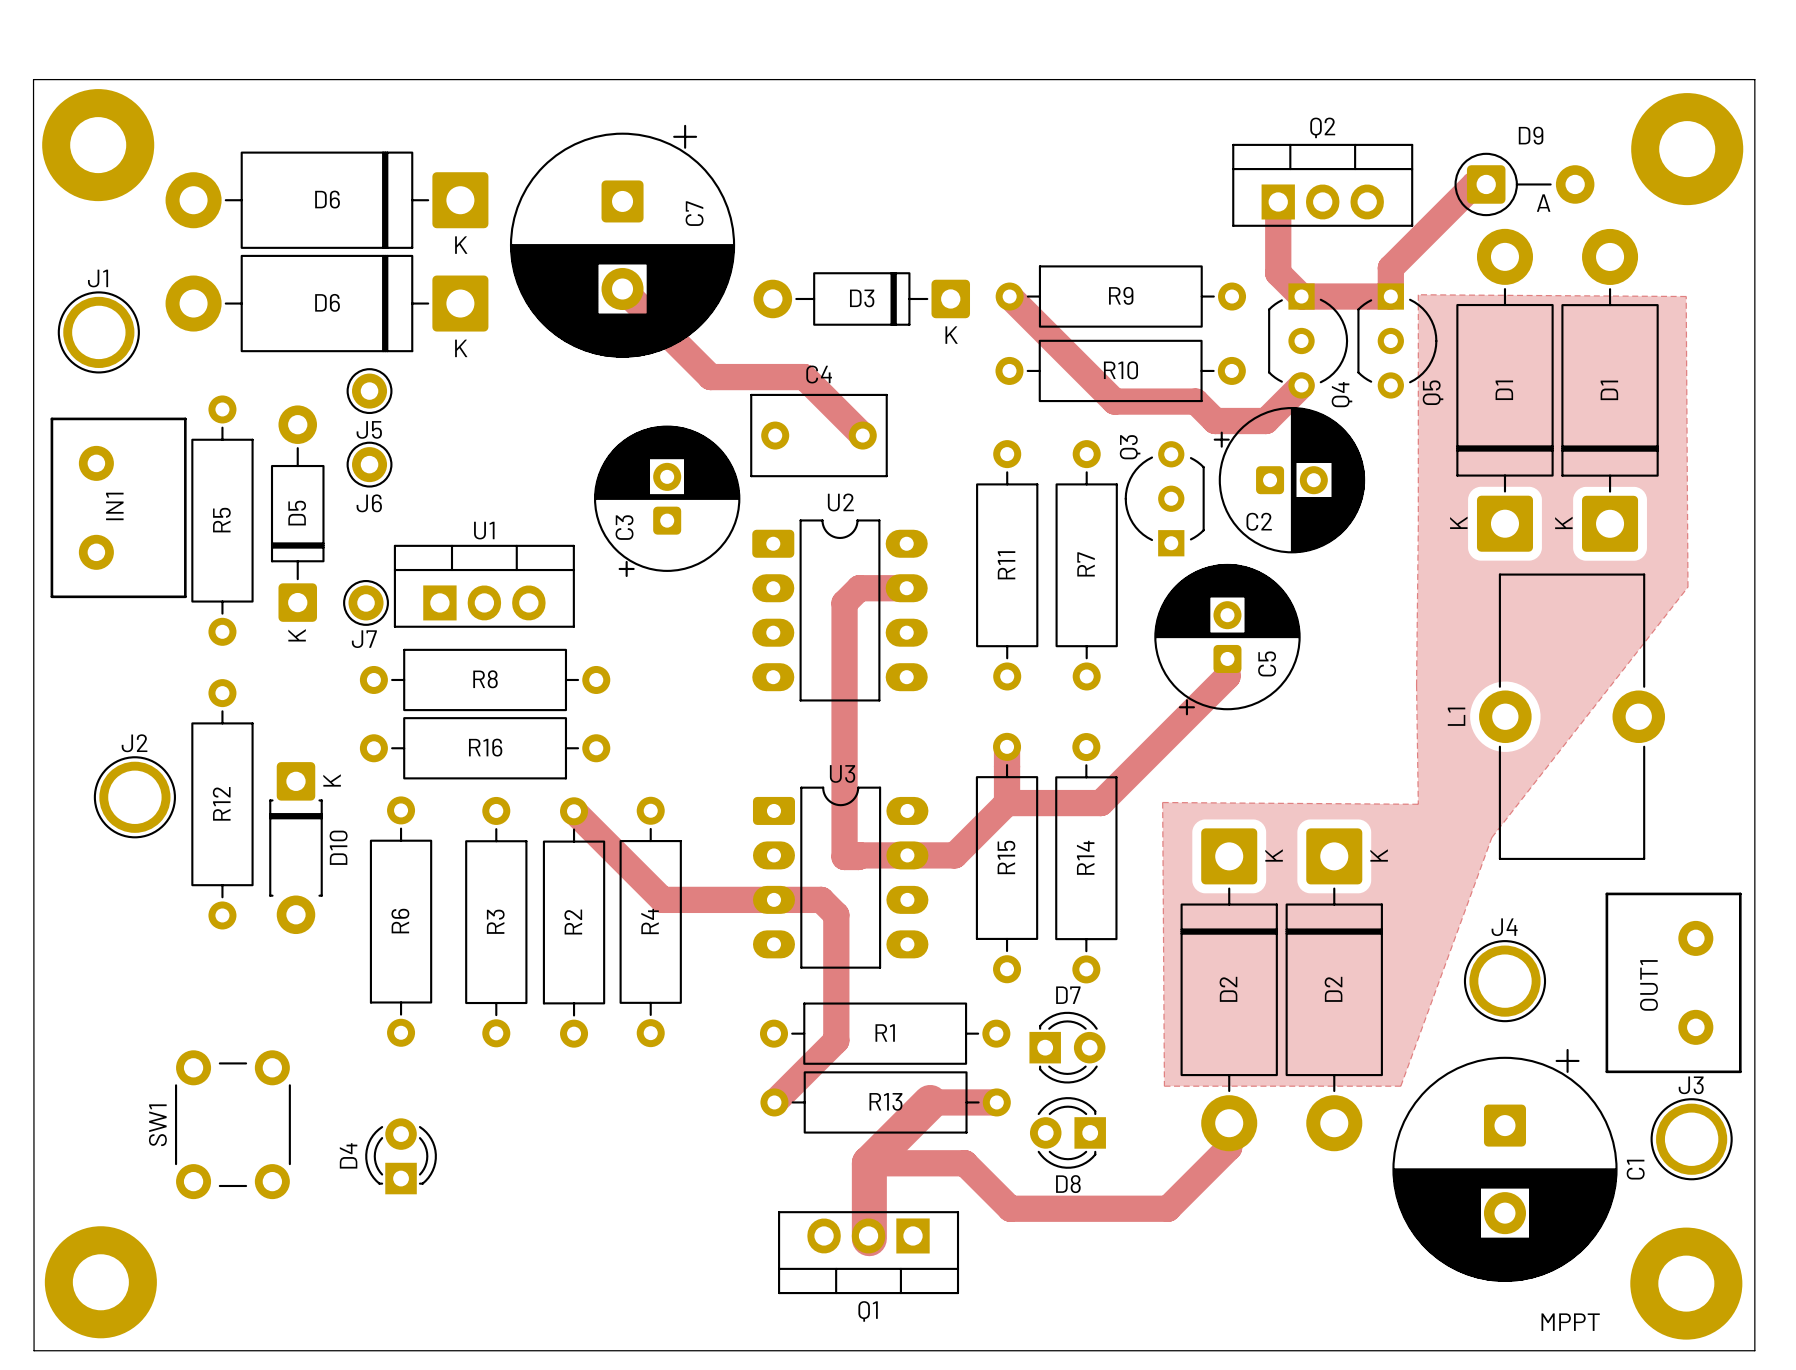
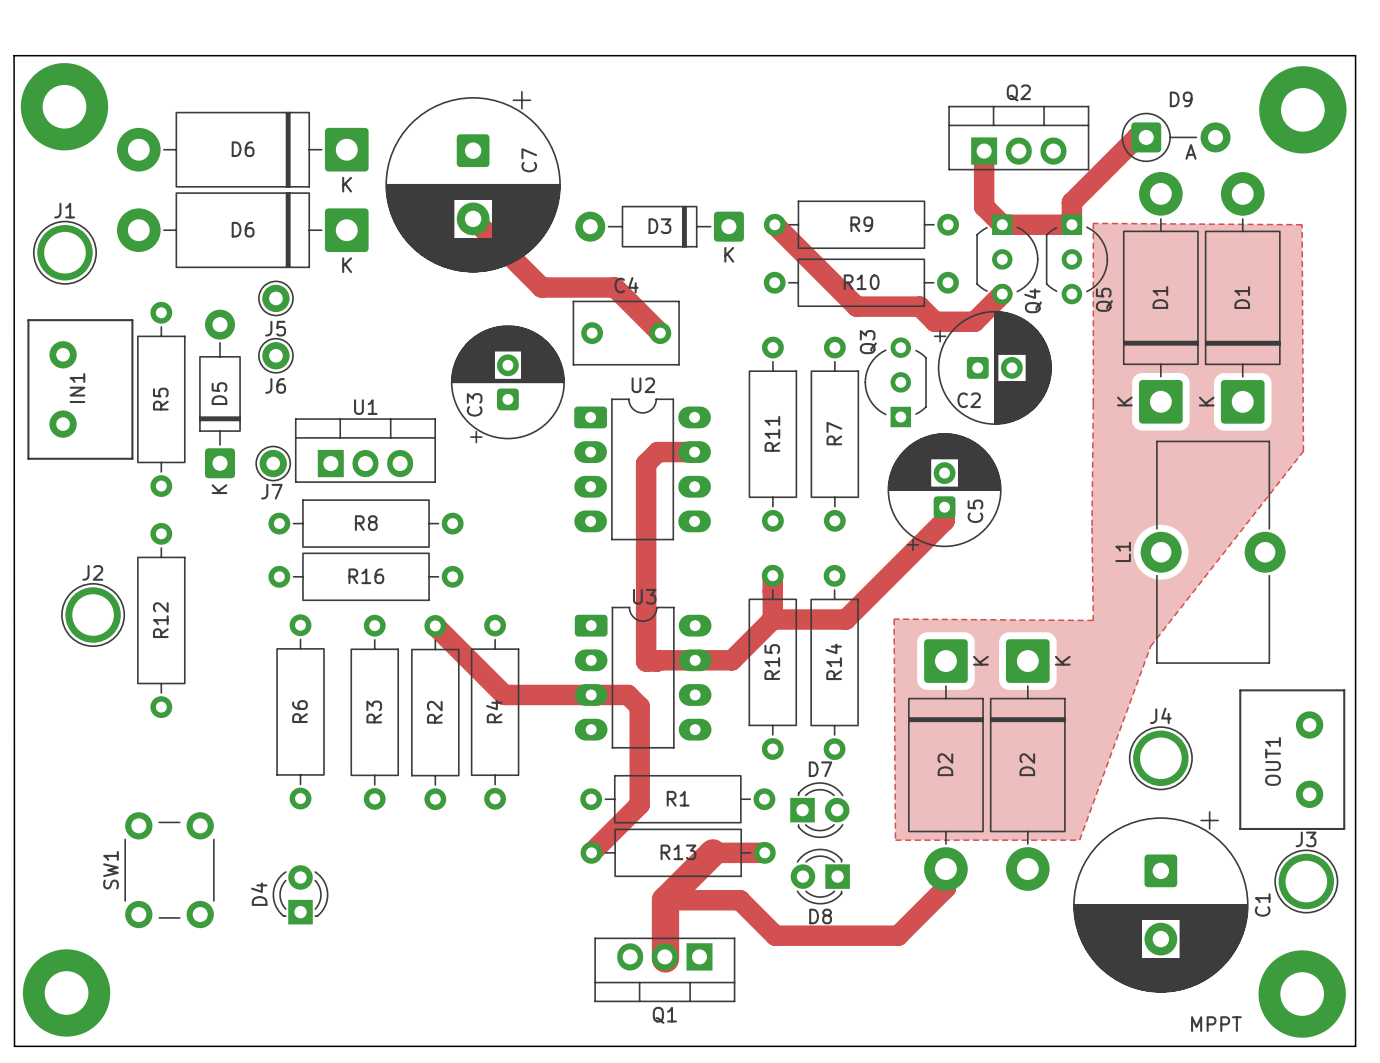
D10: (295, 848) -> none

